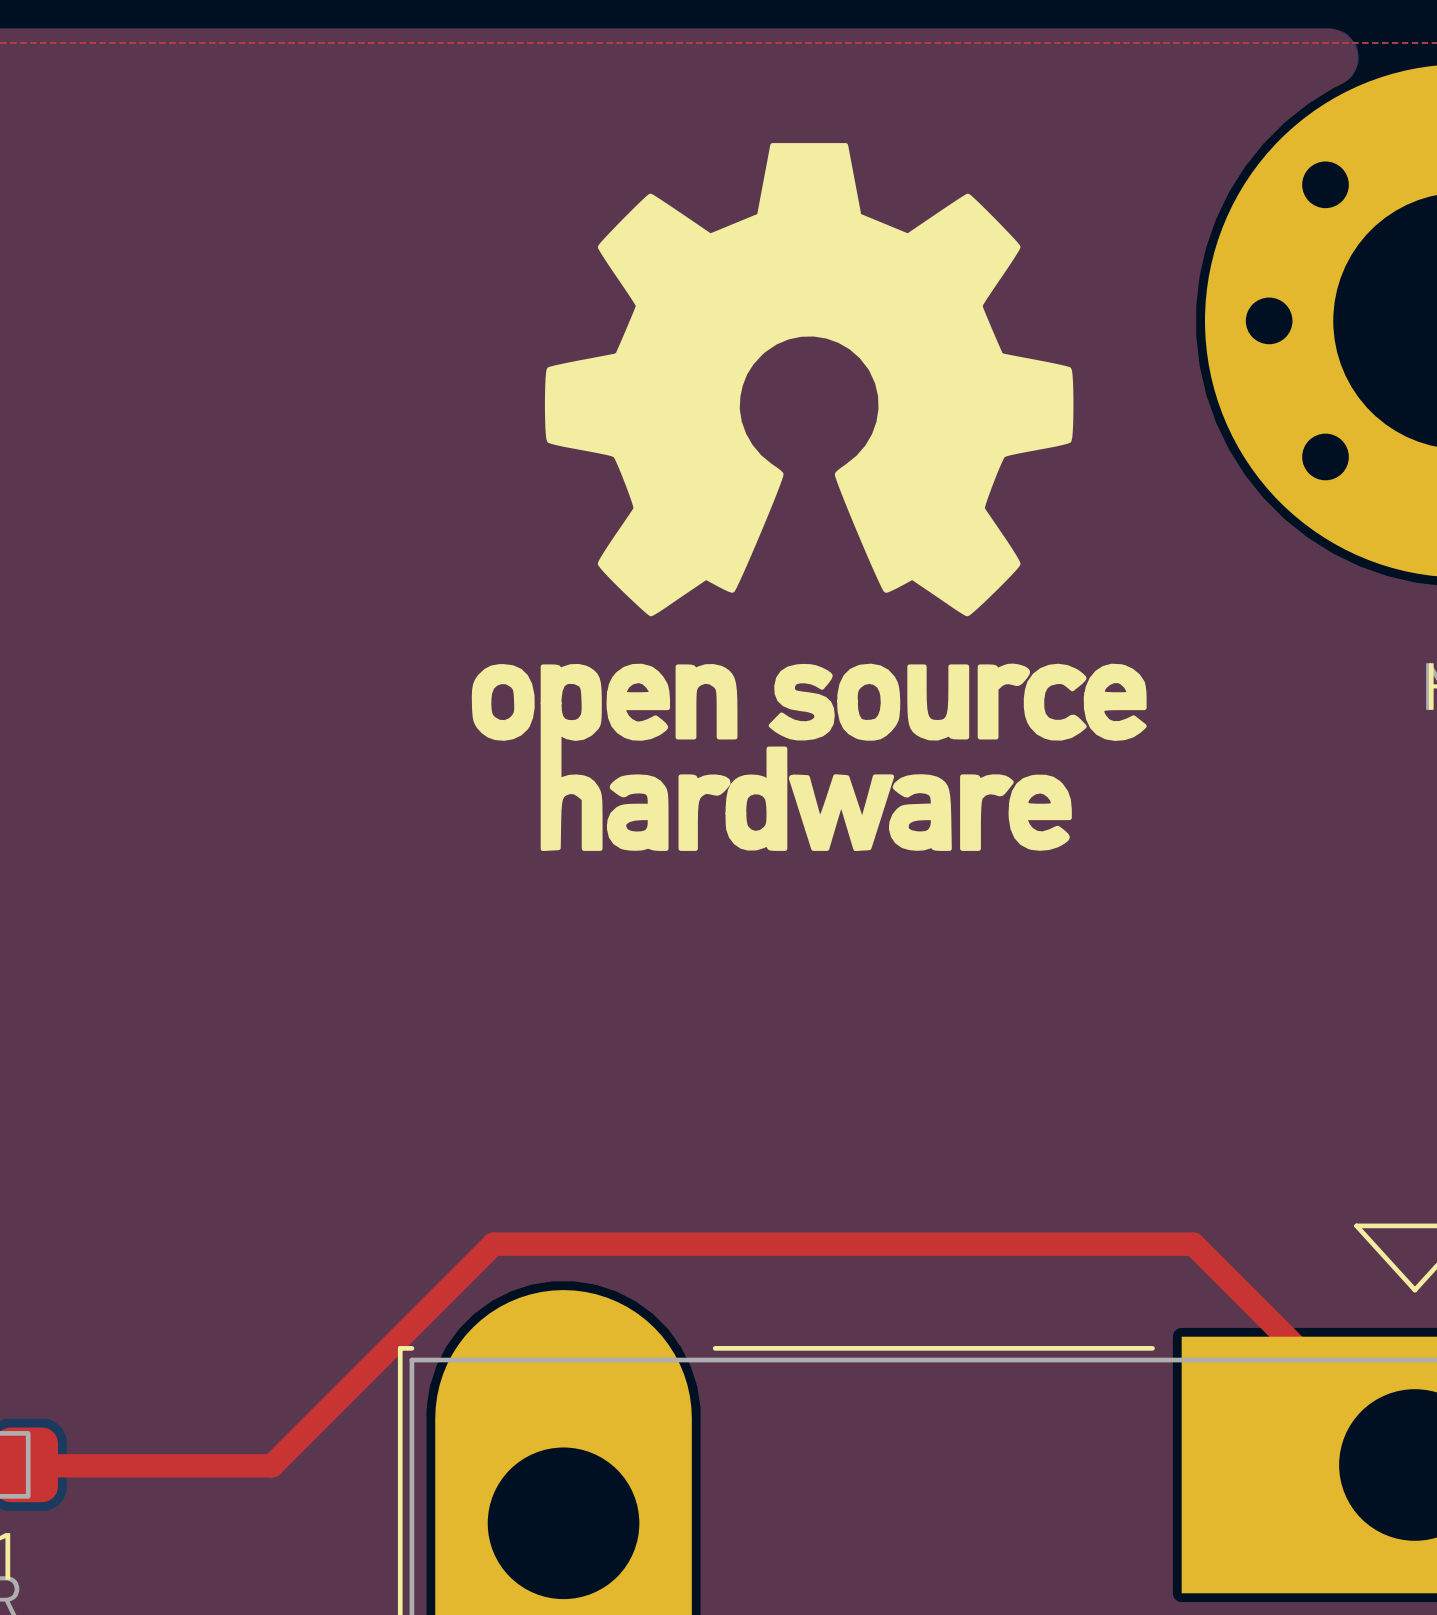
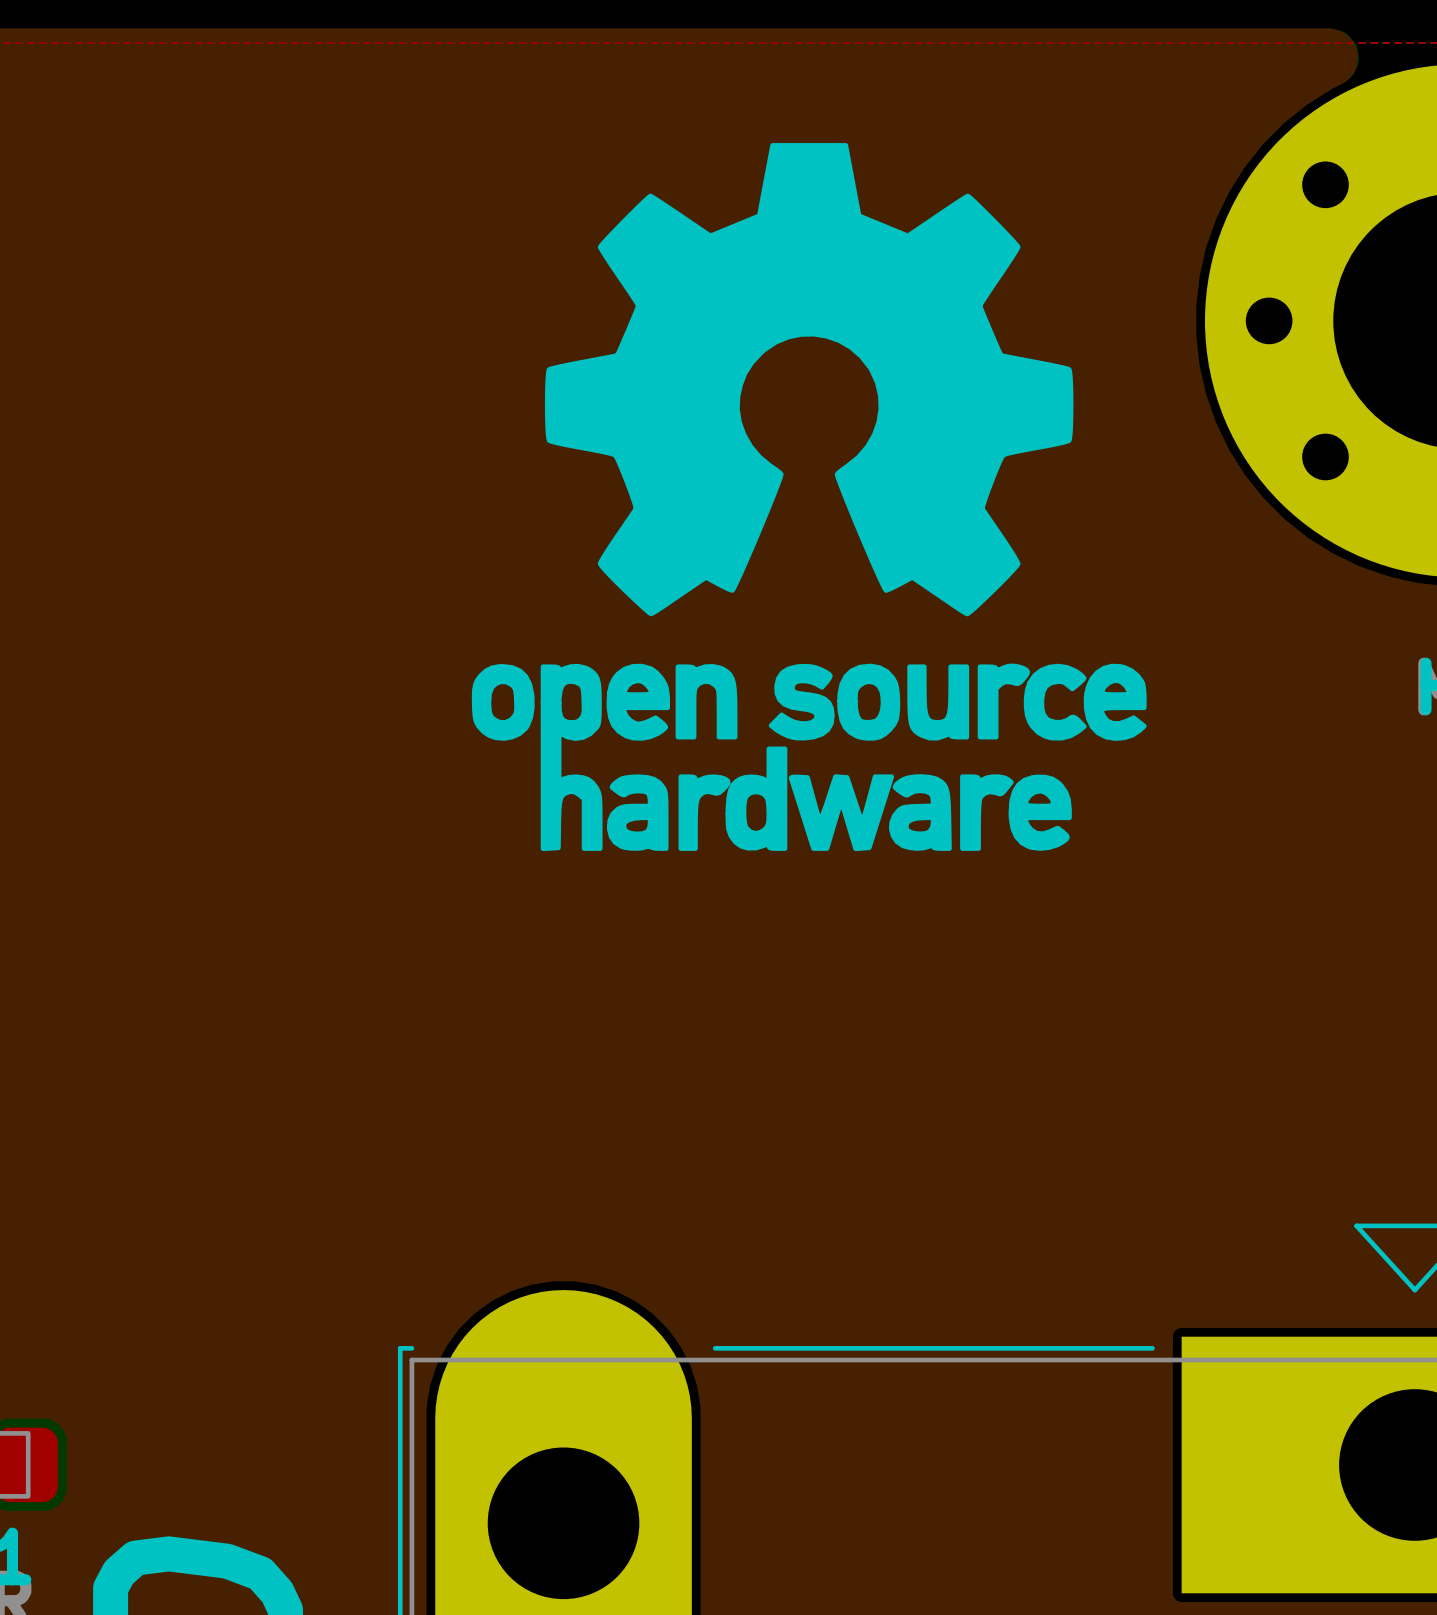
top track: (27, 1465) (271, 1465) (493, 1244) (1193, 1244) (1414, 1465) -> none

